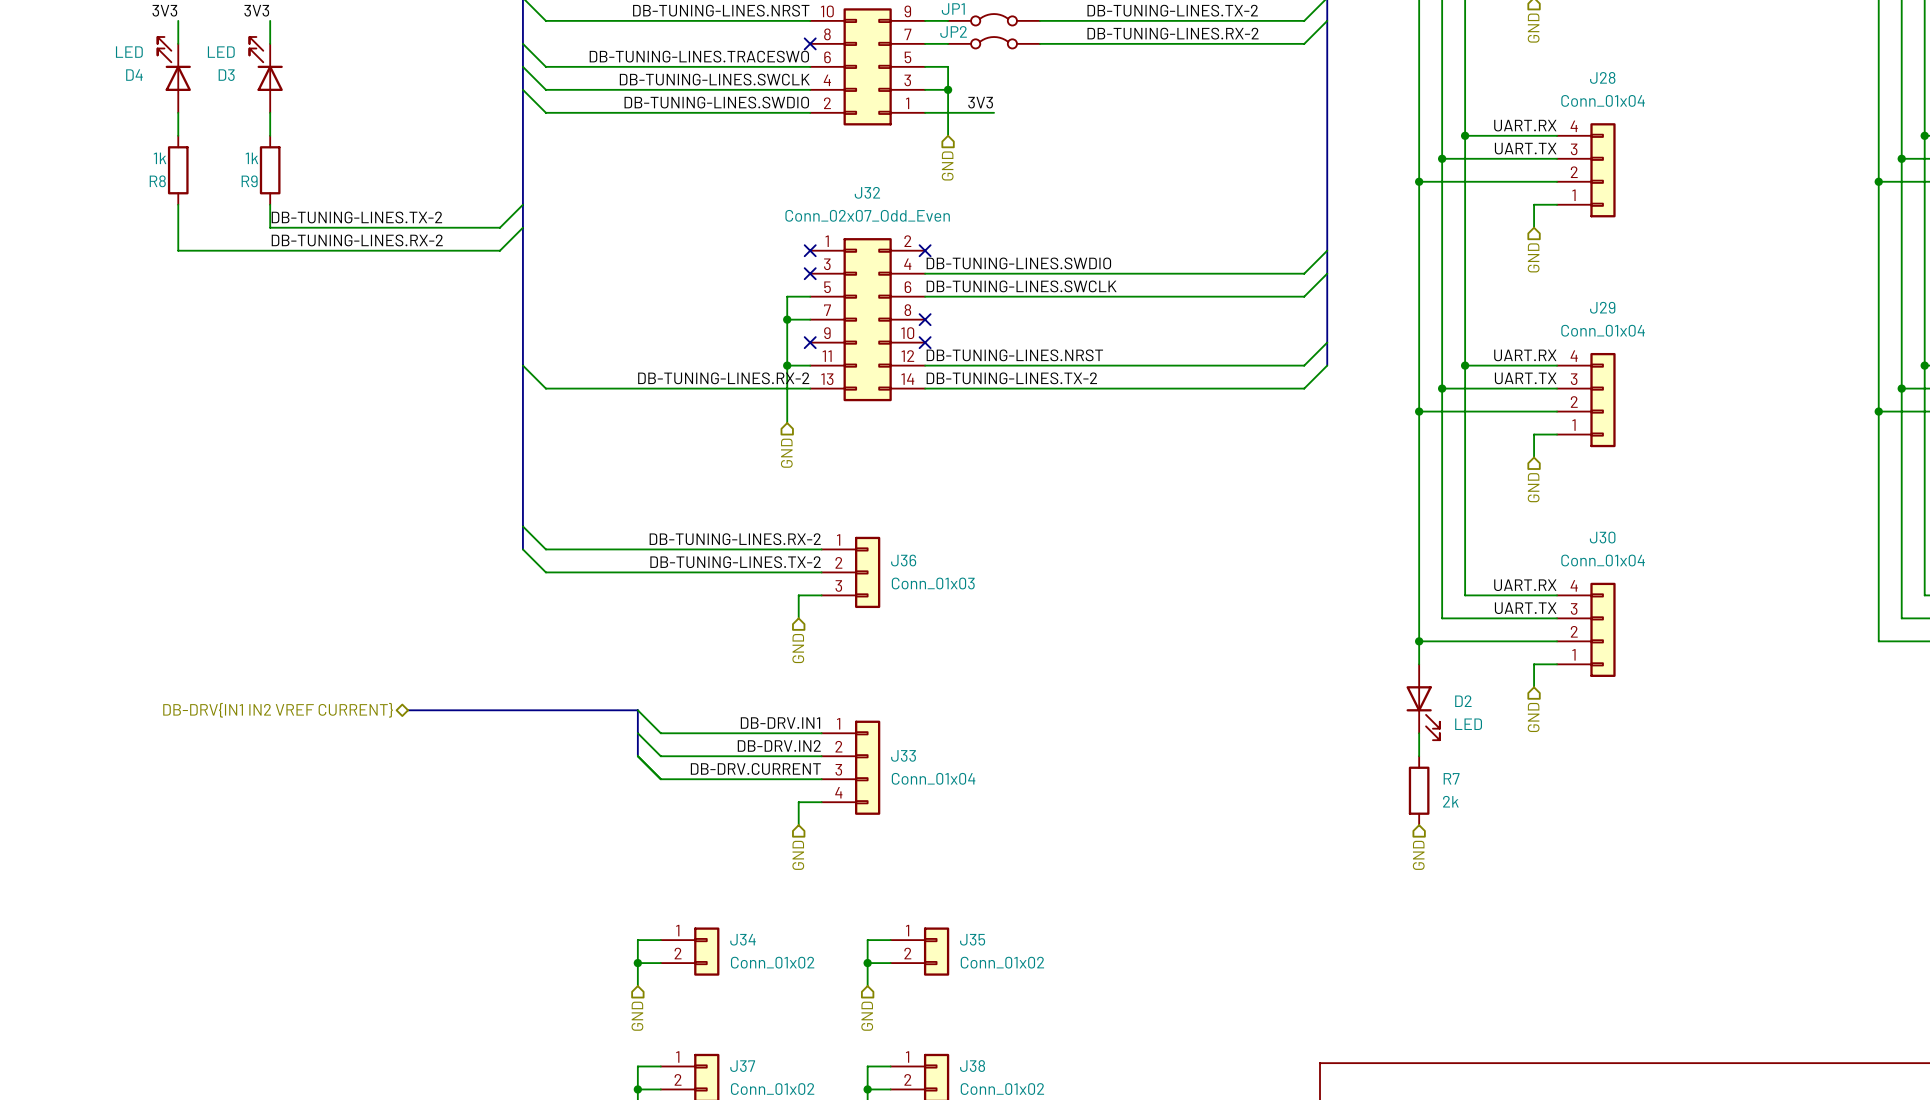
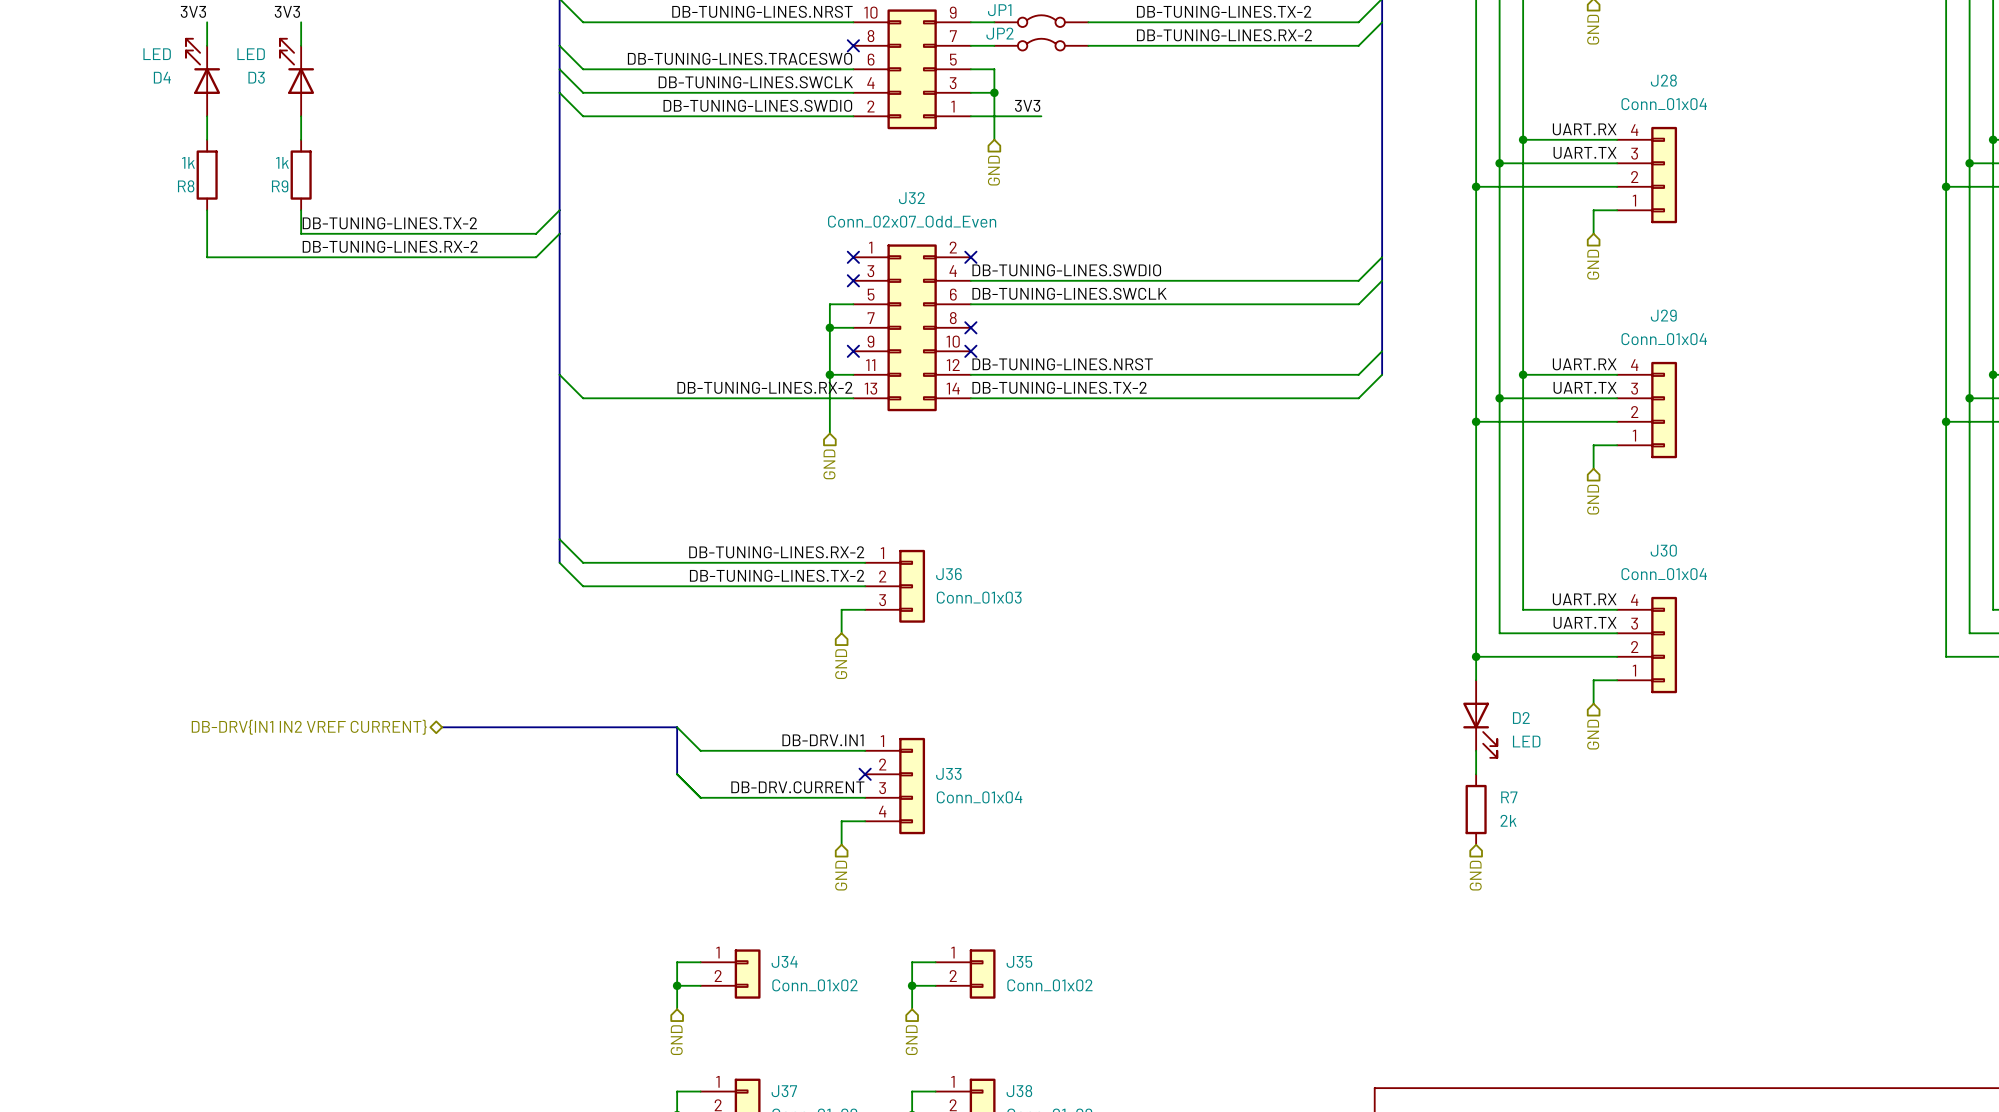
wire: (637, 733) (660, 756) (821, 756) -> none
label: DB-DRV.IN2 (779, 745) -> none
no-connect mark: none -> (865, 774)

